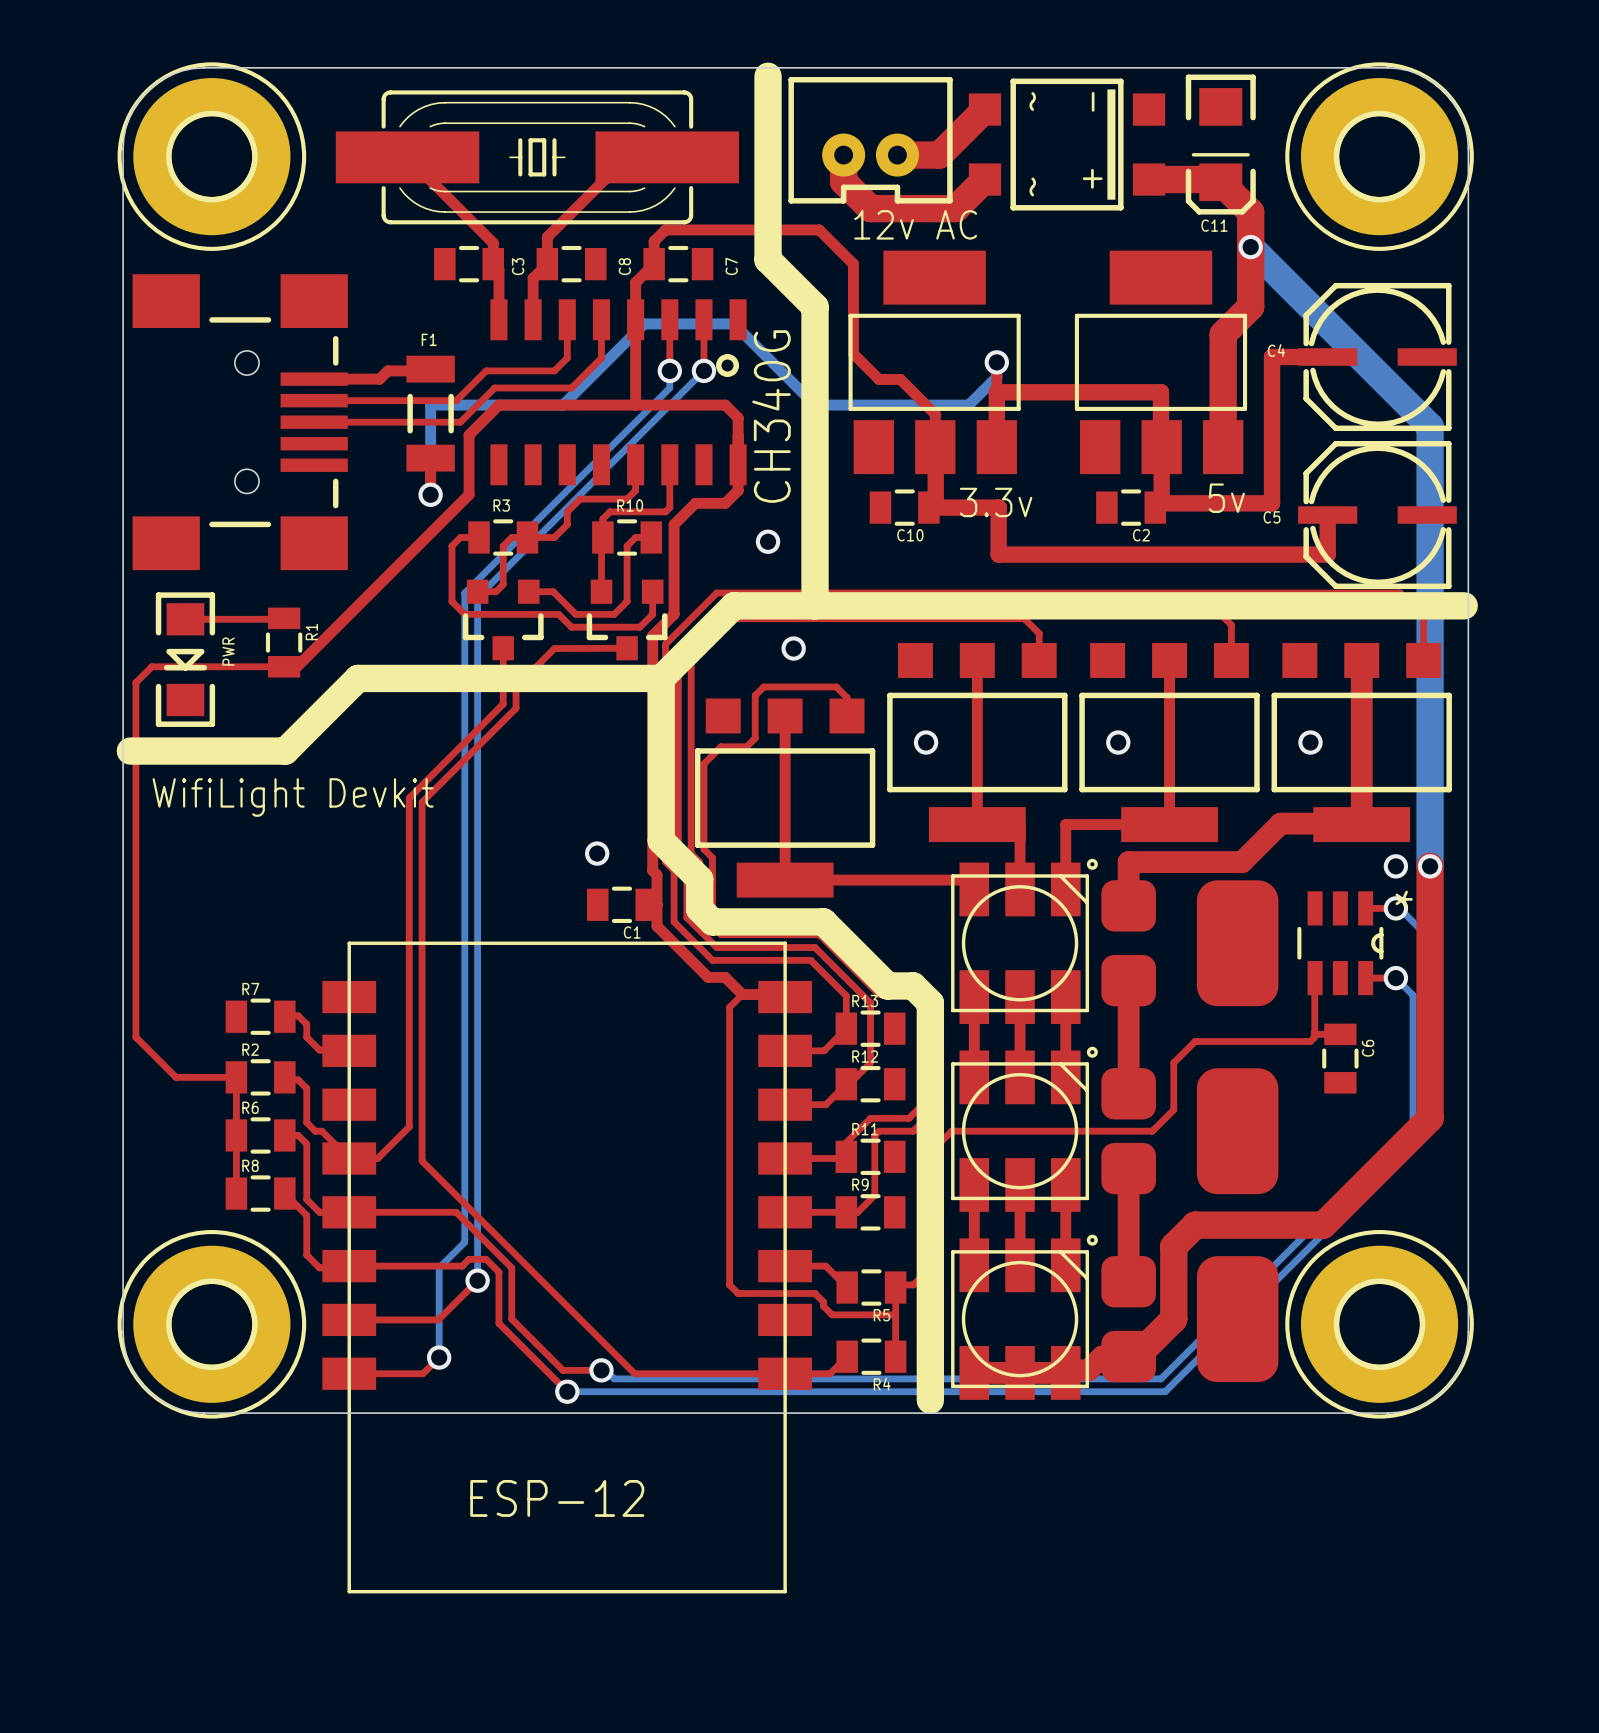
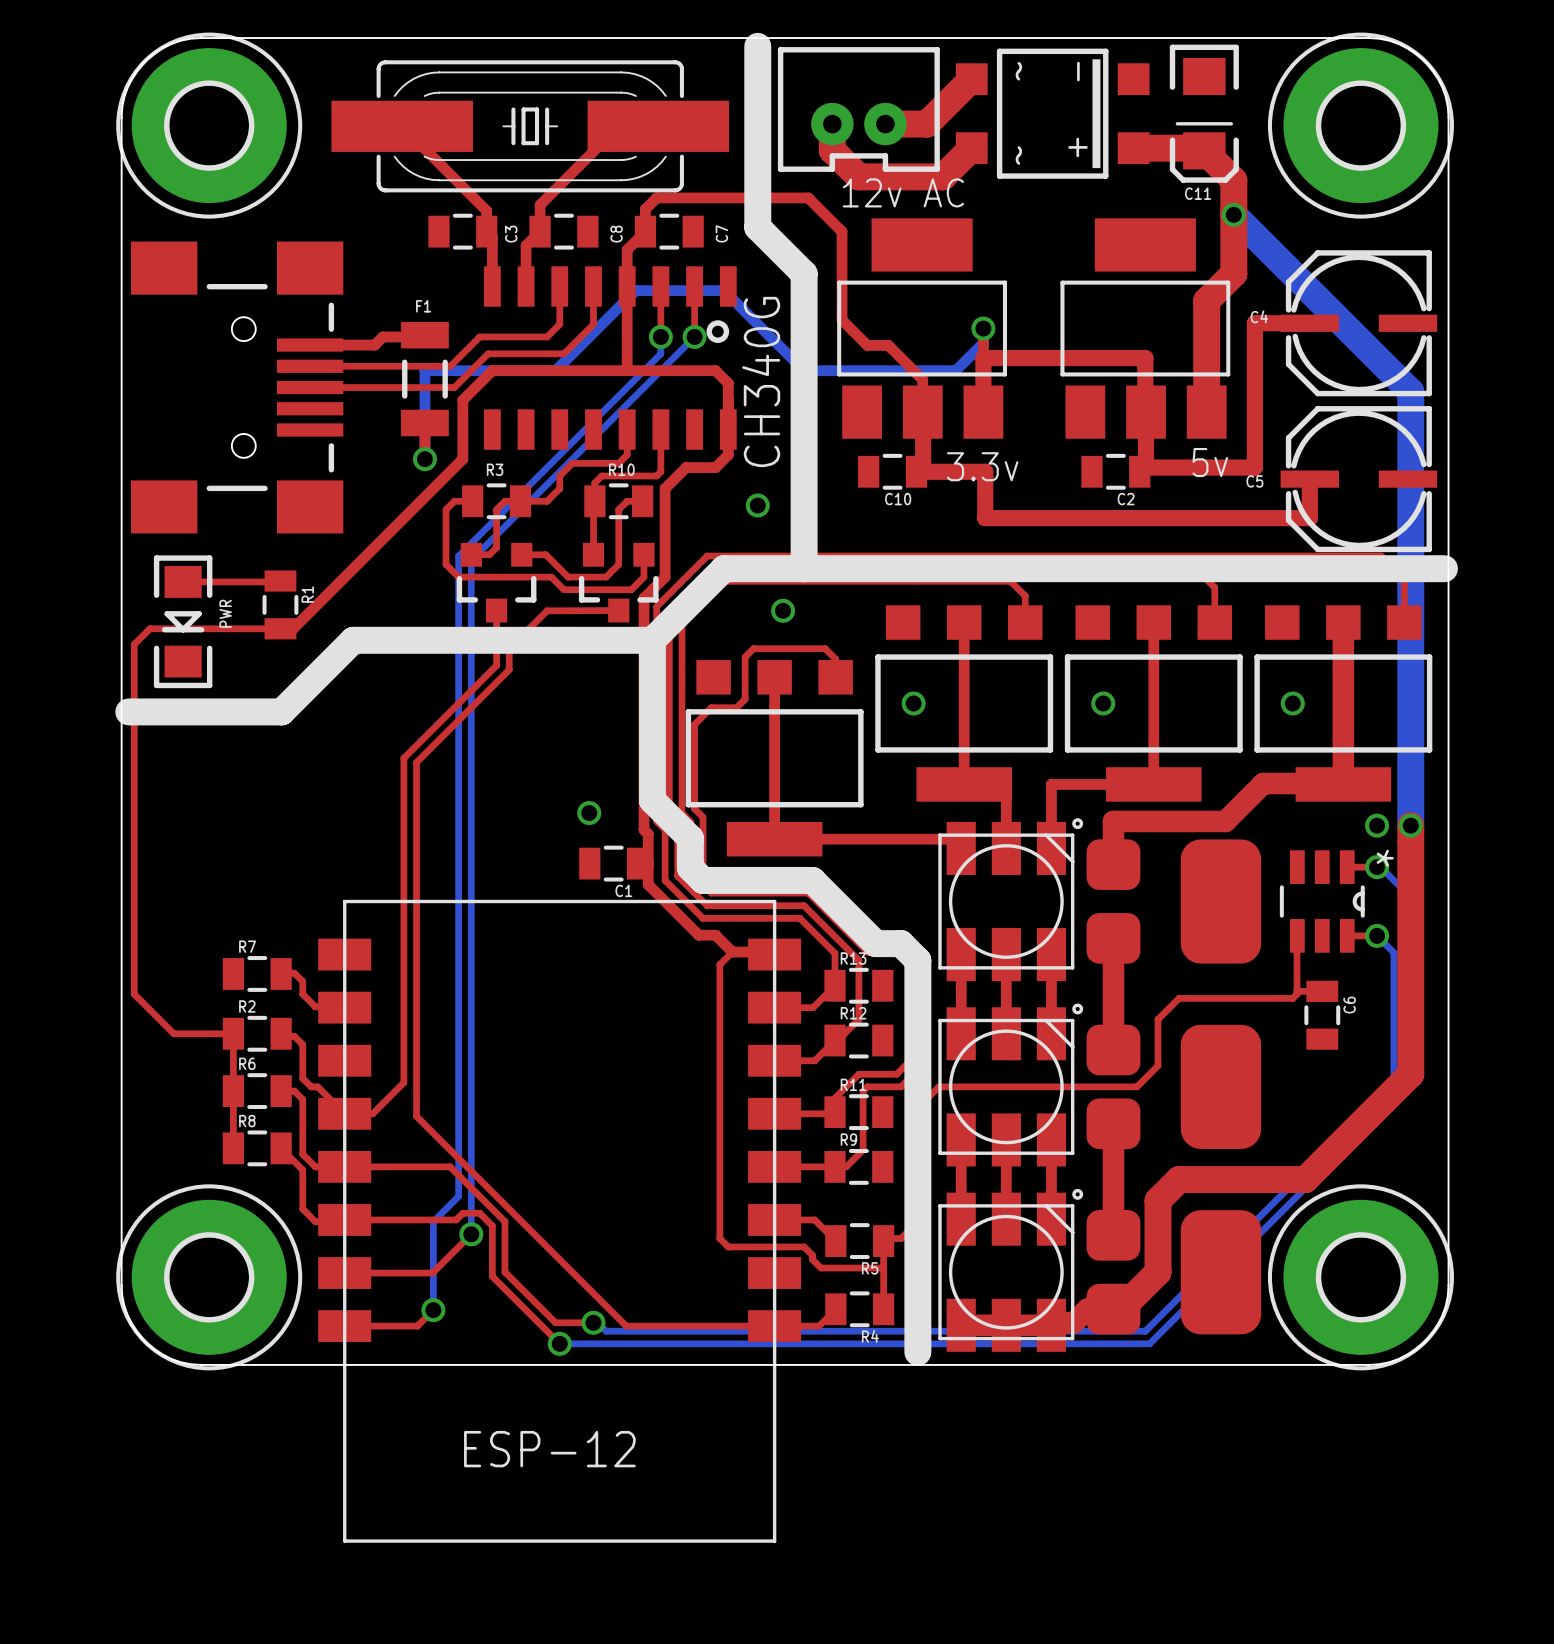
text: WifiLight Devkit (293, 797) -> none

